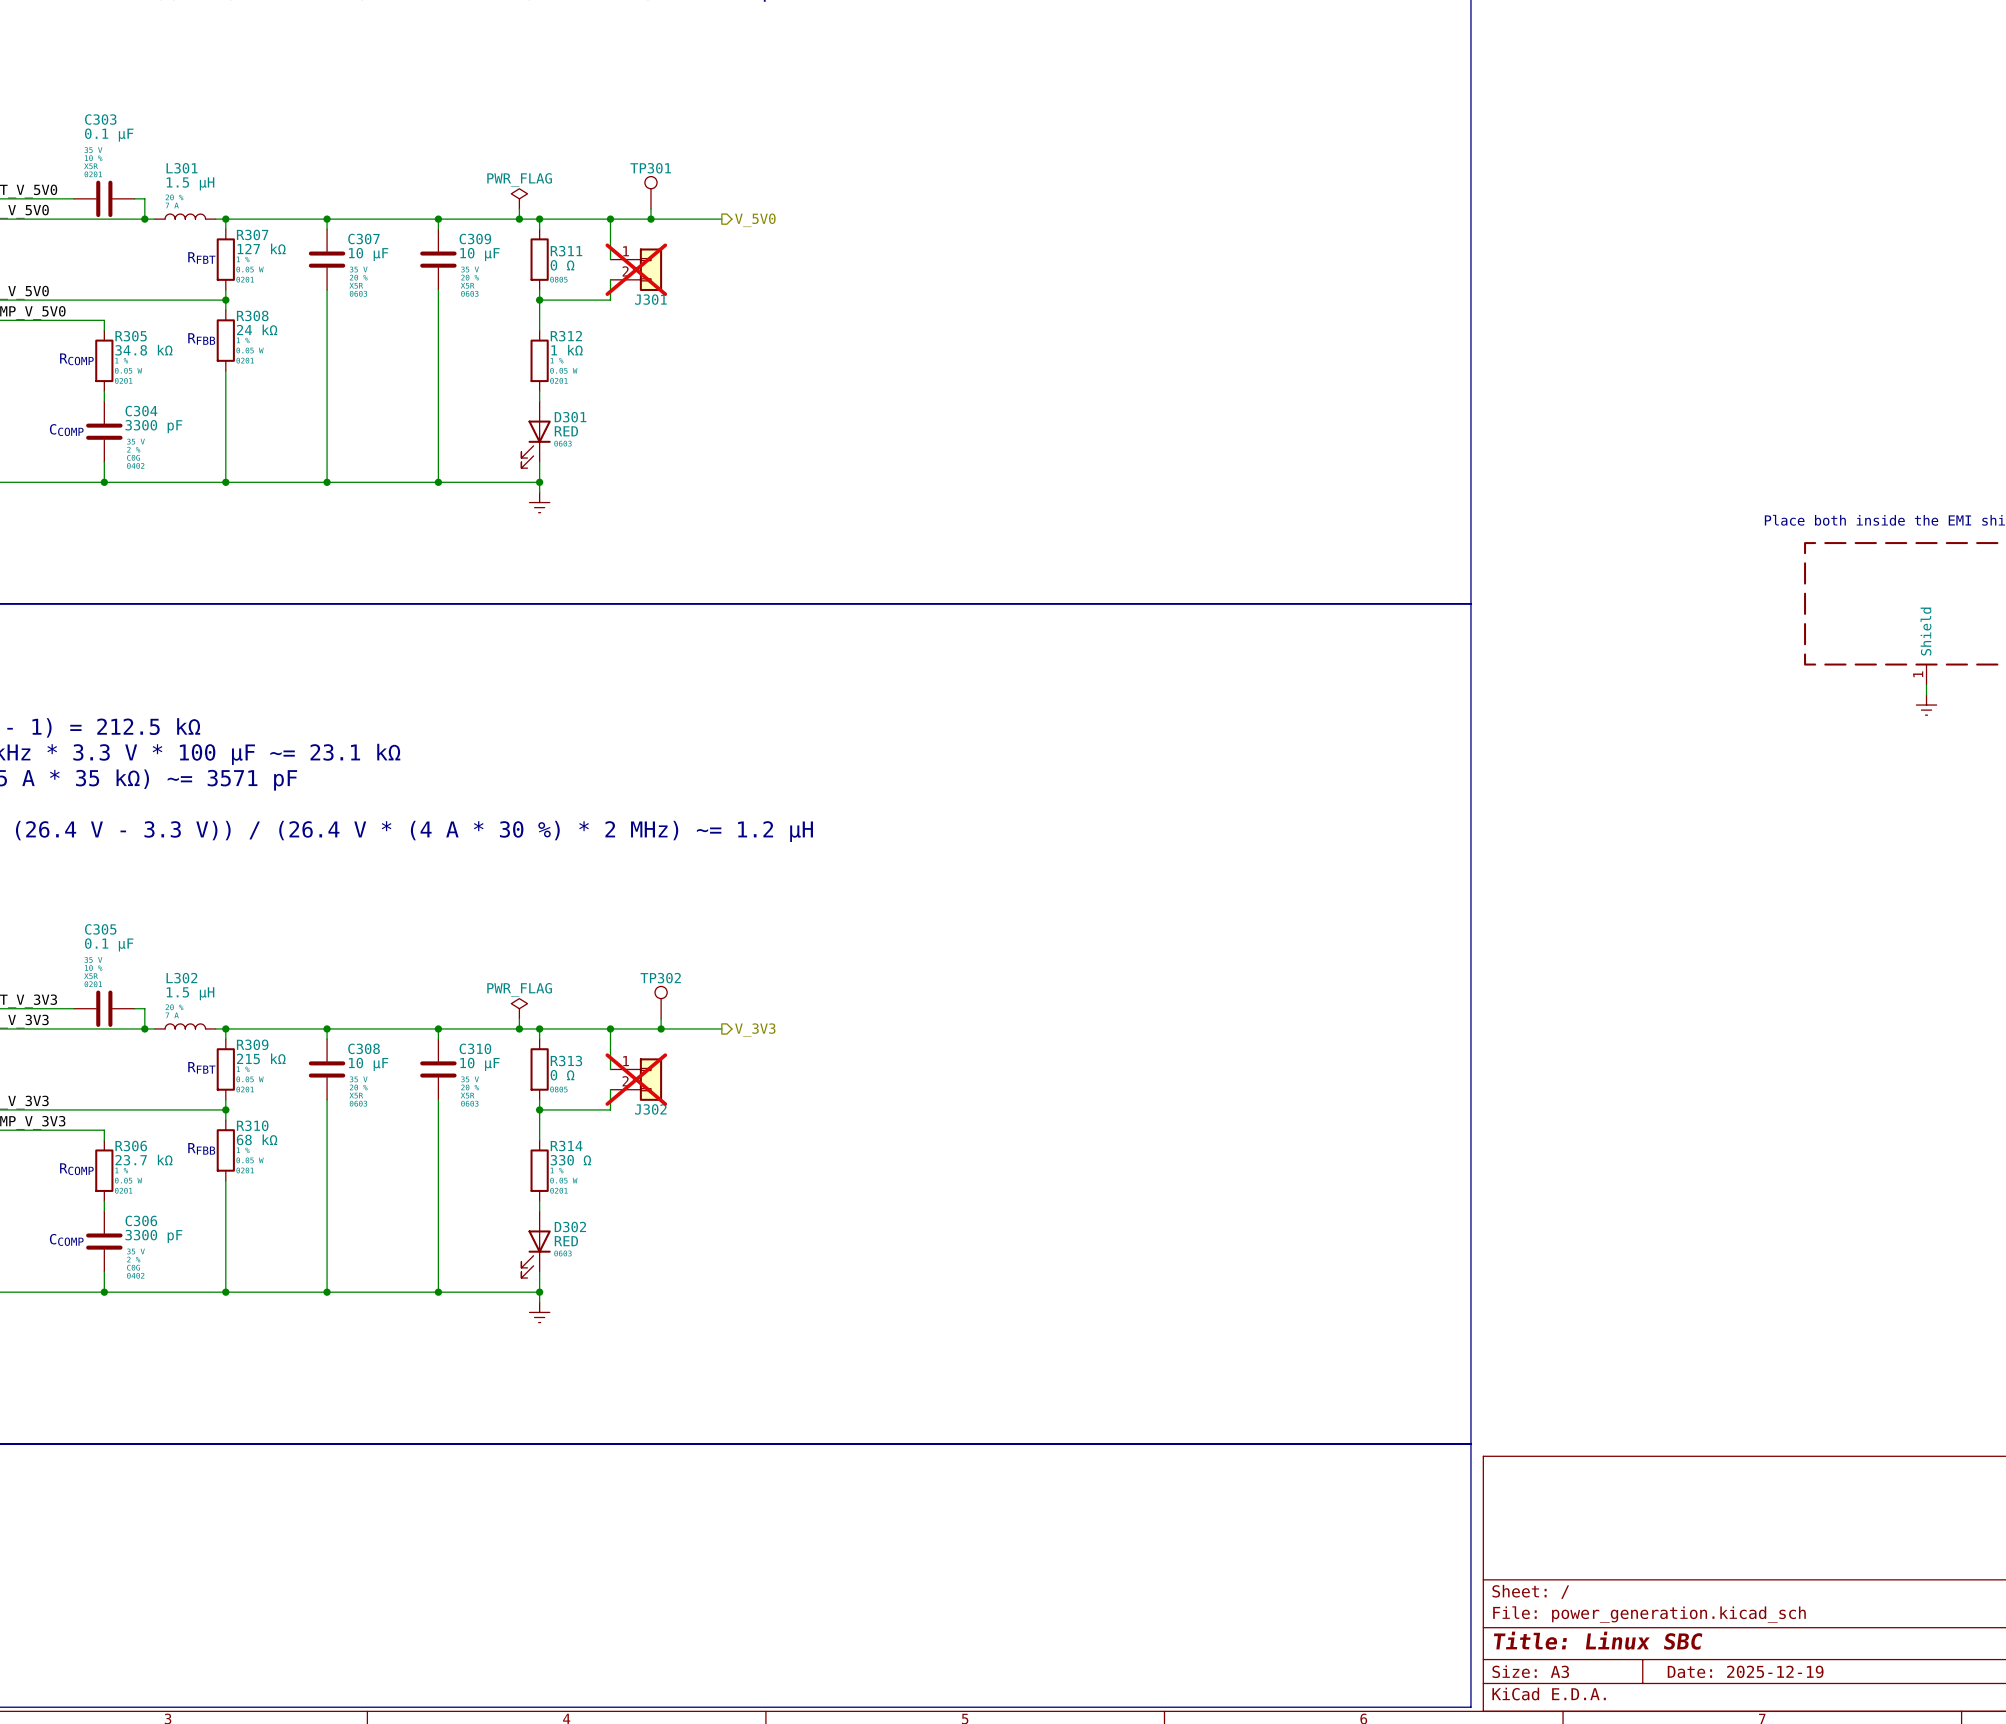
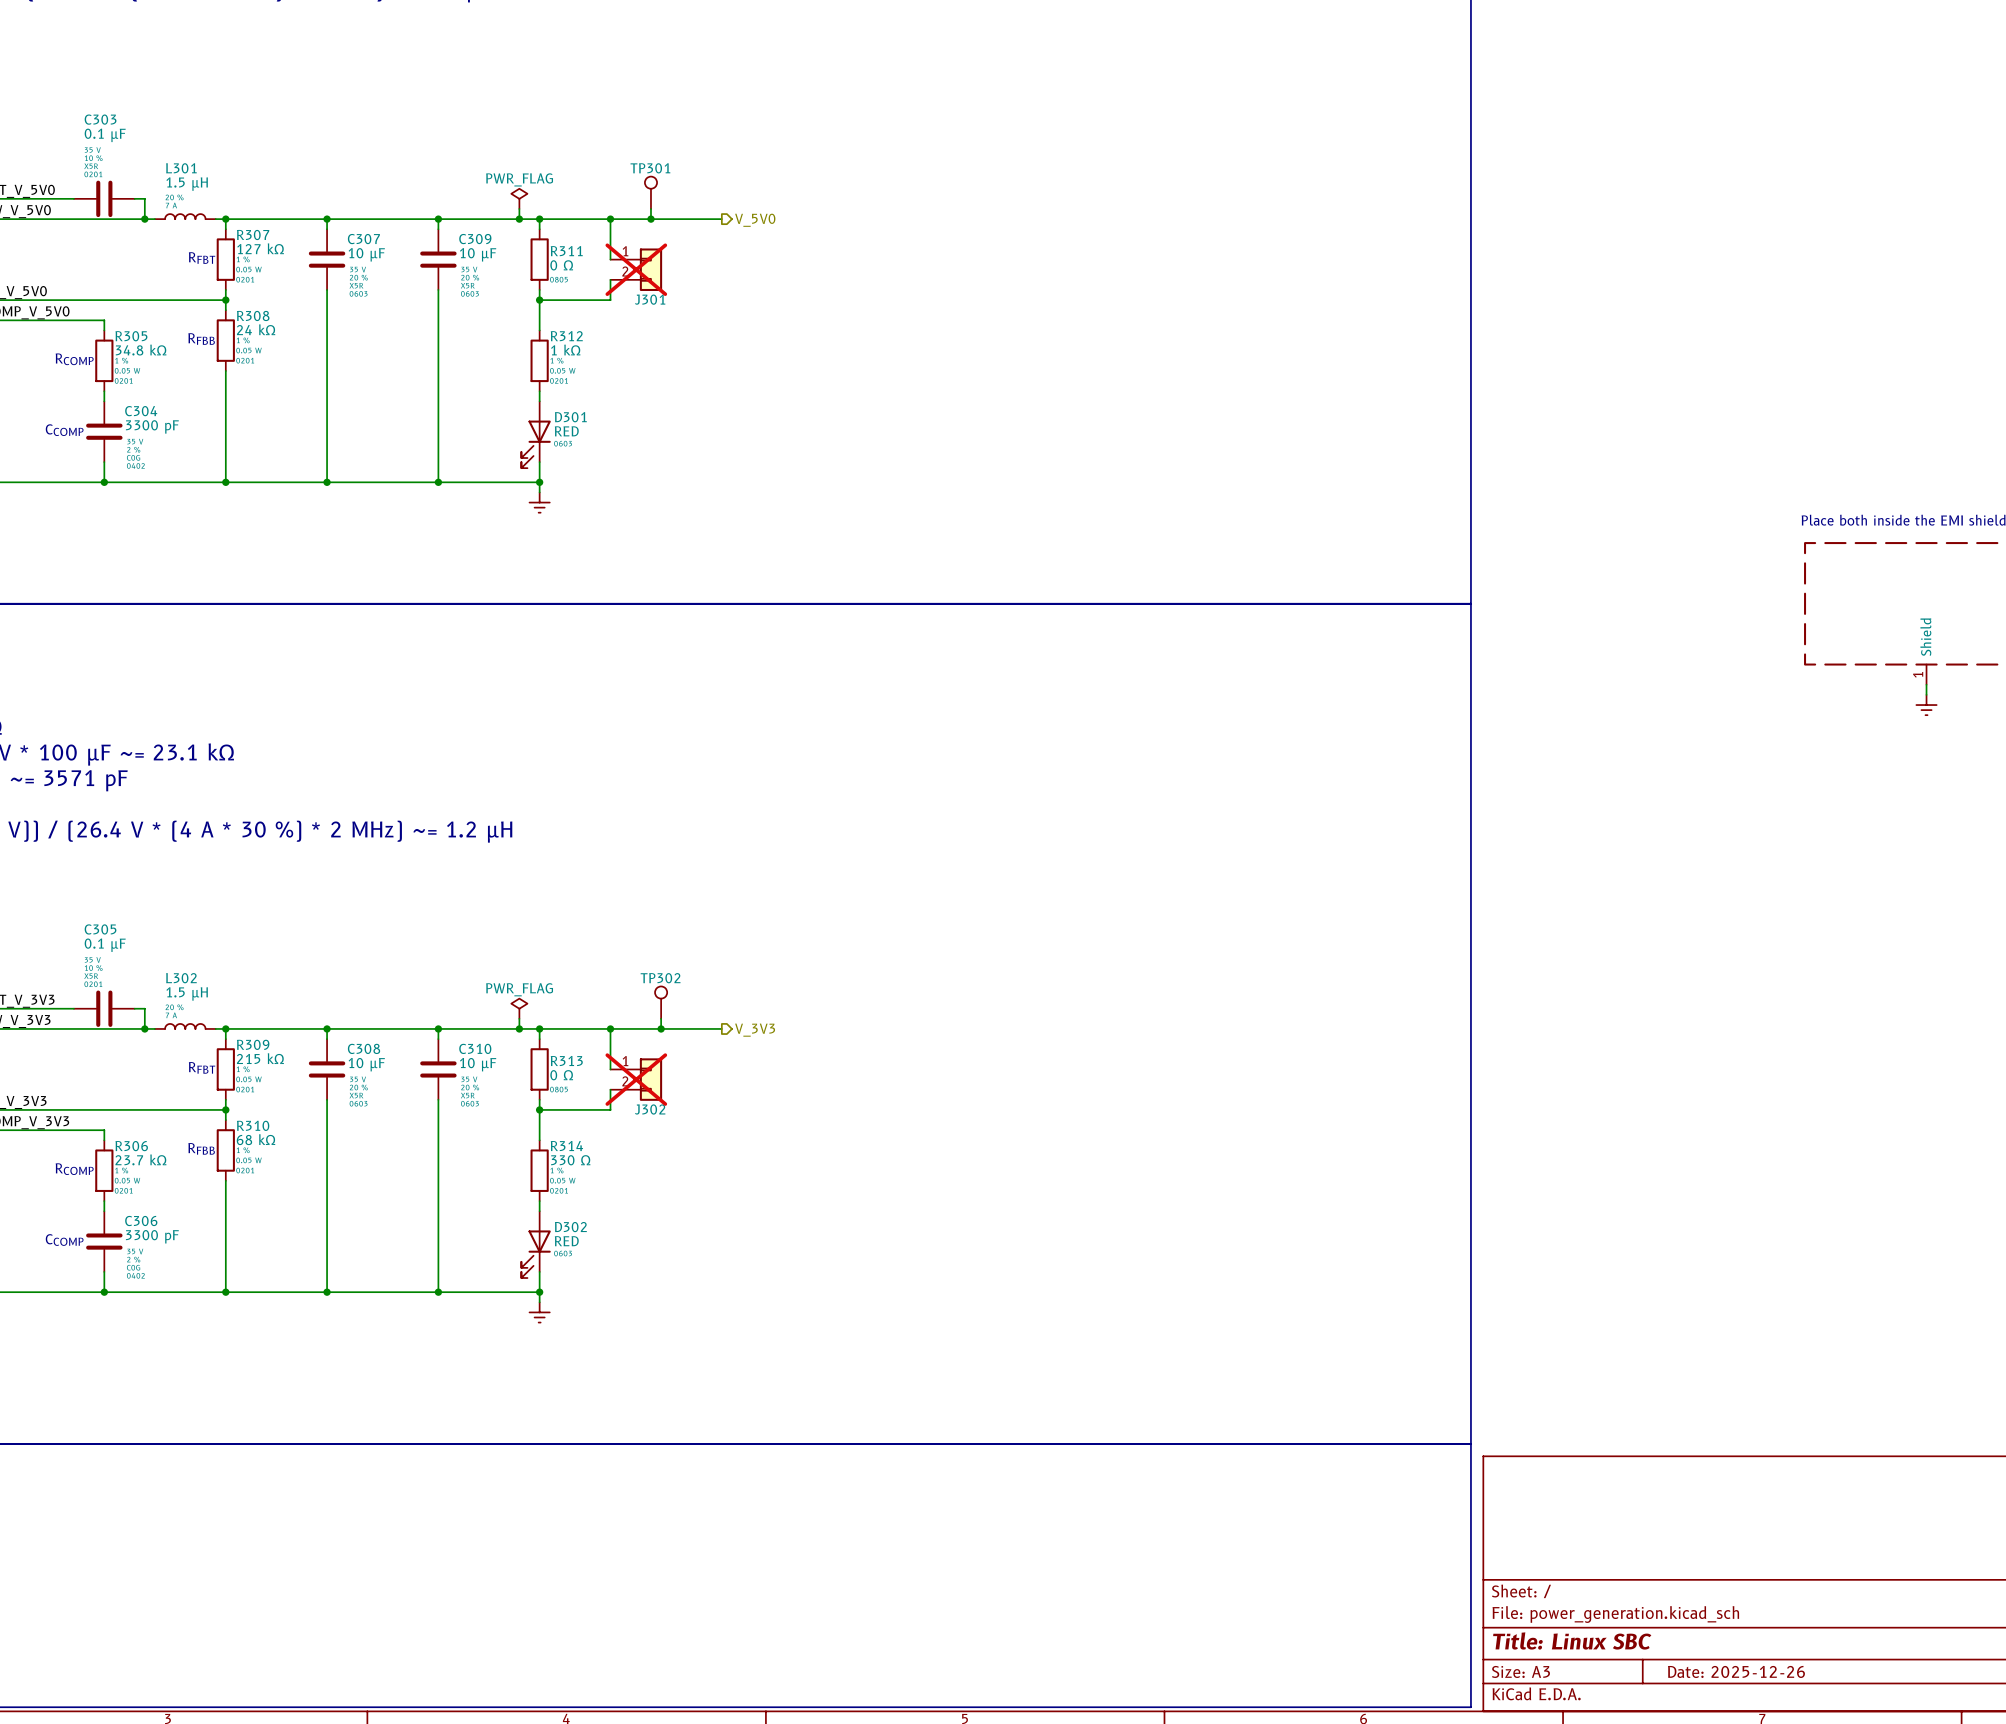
title block: Date: 2025-12-19 (1745, 1671) -> Date: 2025-12-26 (1736, 1671)

